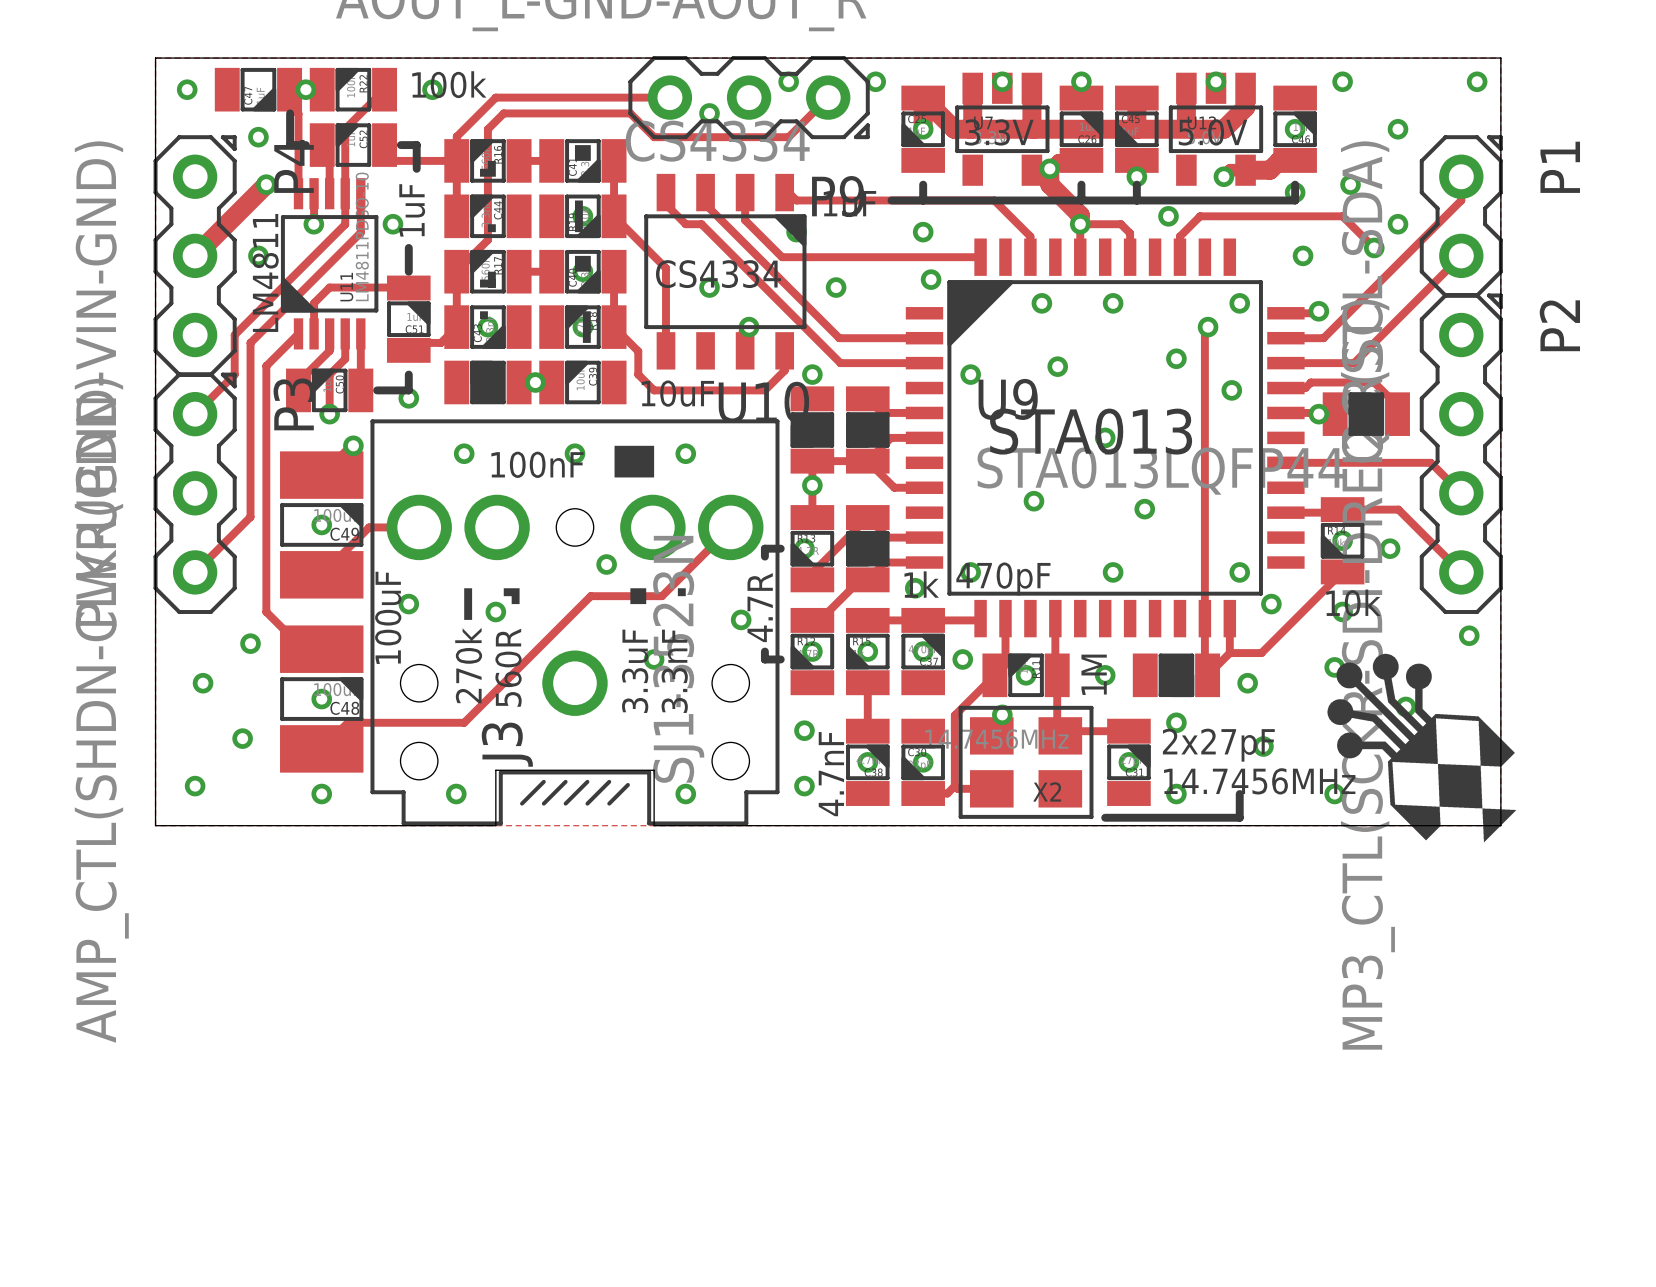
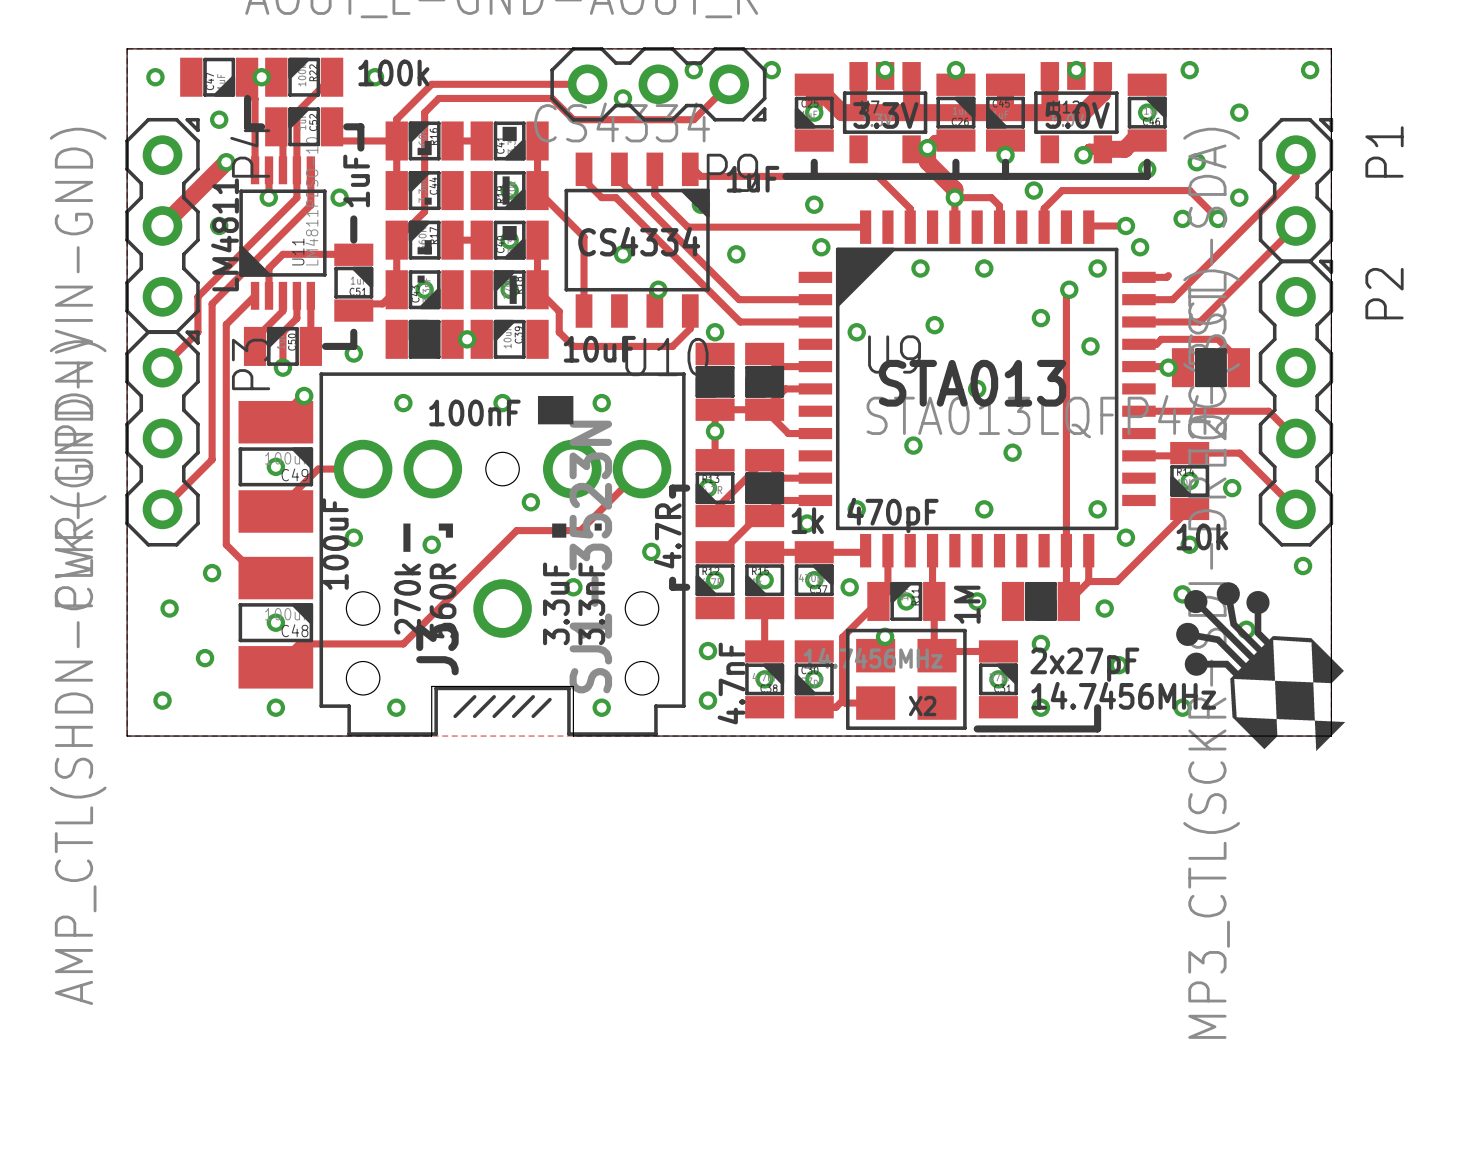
via: none -> (1182, 218)
track: none -> (1125, 225) (1088, 227)
via: none -> (1125, 225)
via: (1303, 255) -> none
via: none -> (1140, 247)
via: (1318, 311) -> none

